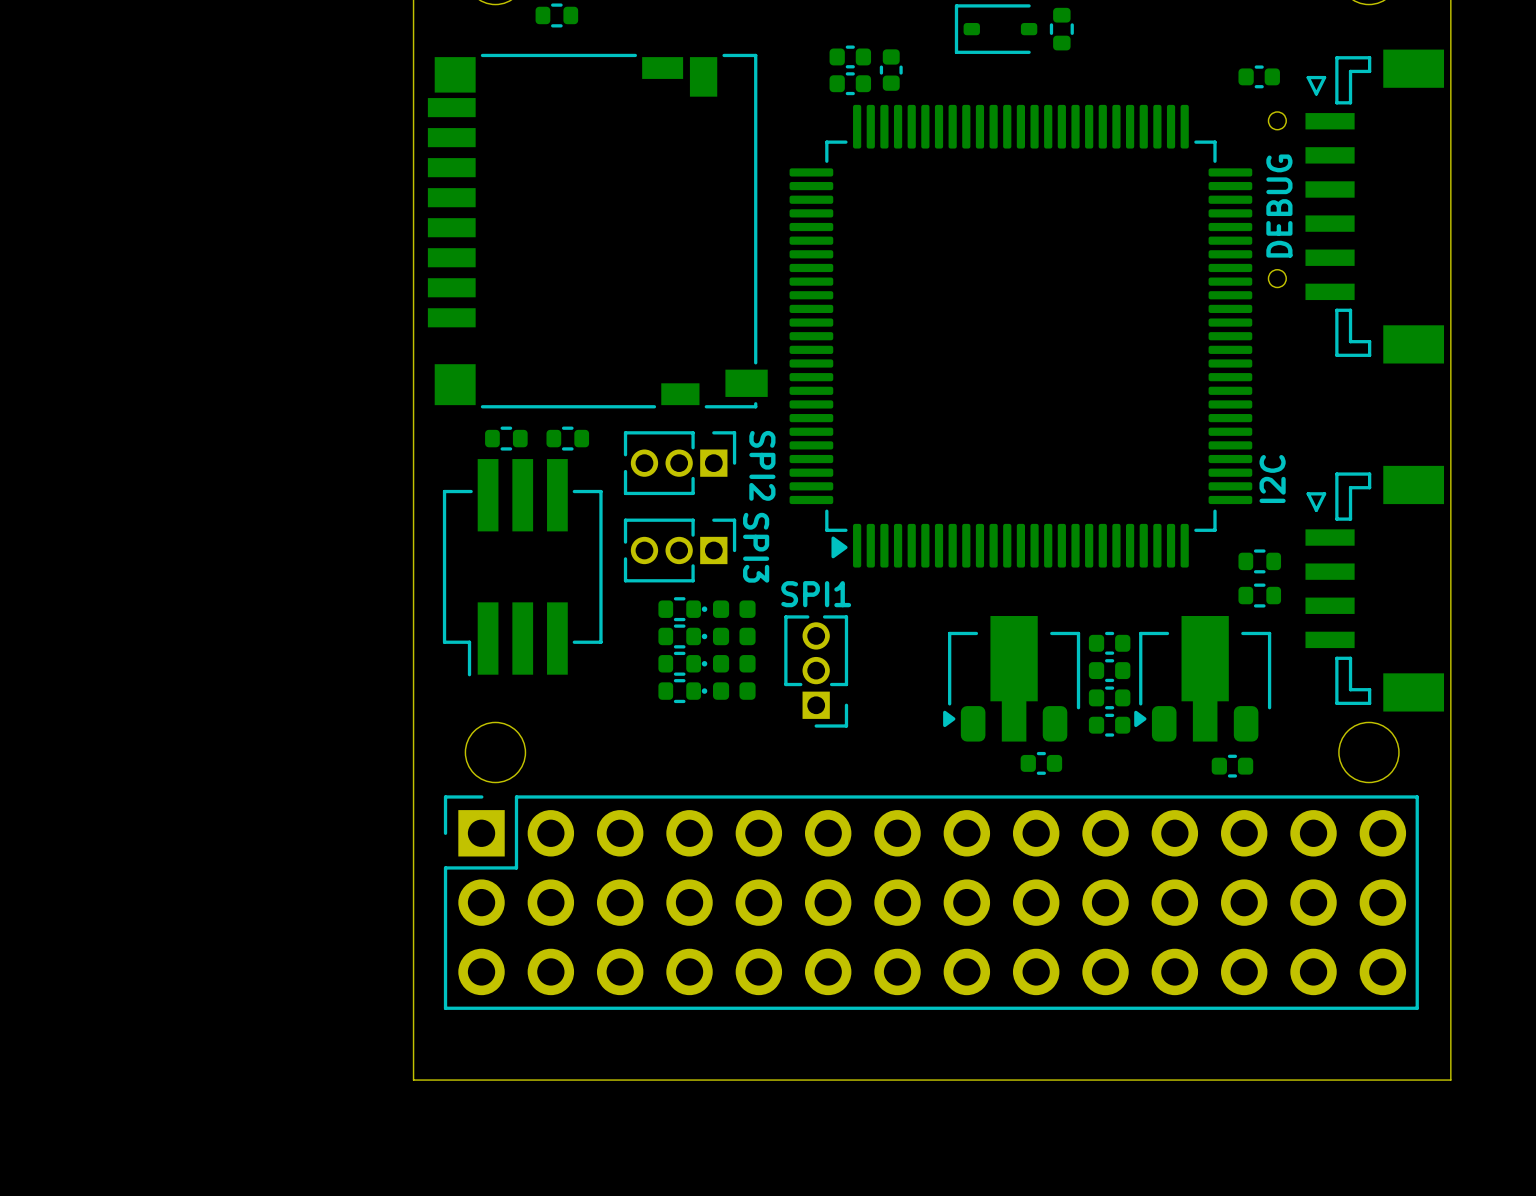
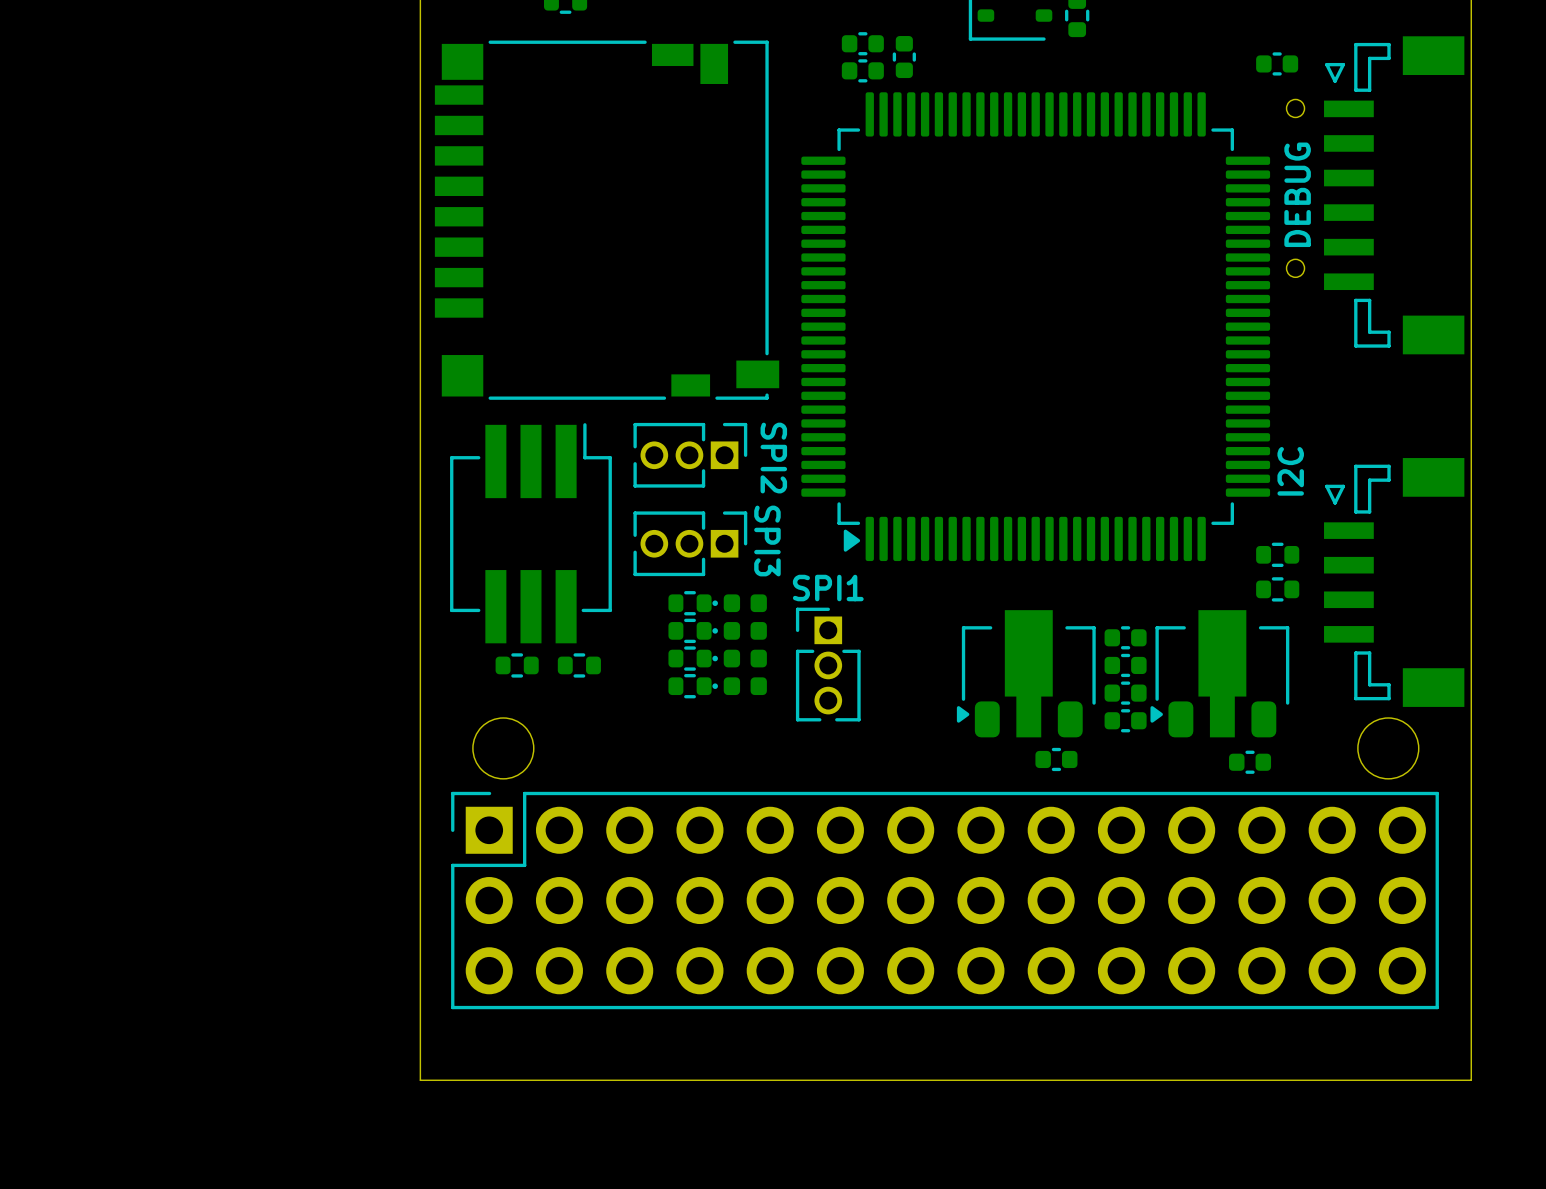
part: (506, 438) -> none
part: (567, 438) -> none
part rotation: 0° (522, 567) -> 180° (530, 533)
part: none -> (517, 665)
part: none -> (579, 665)
part rotation: 0° (816, 671) -> 180° (828, 664)

